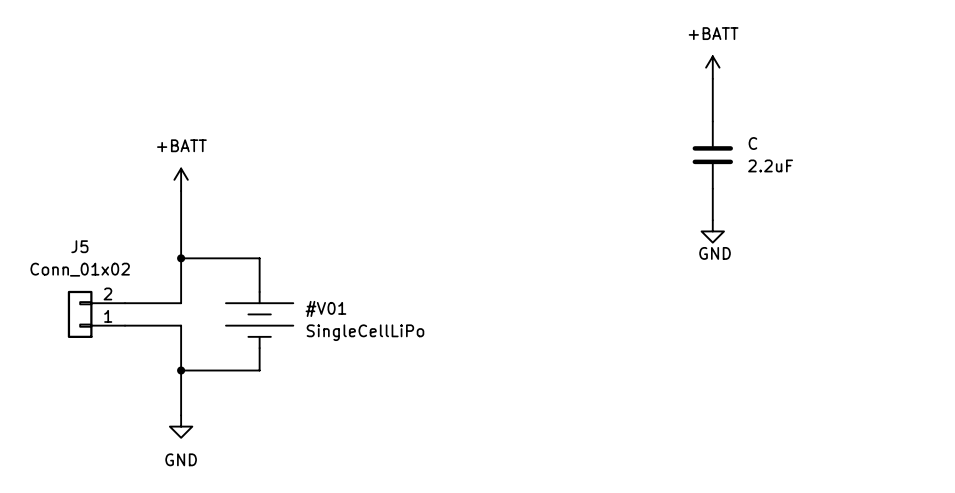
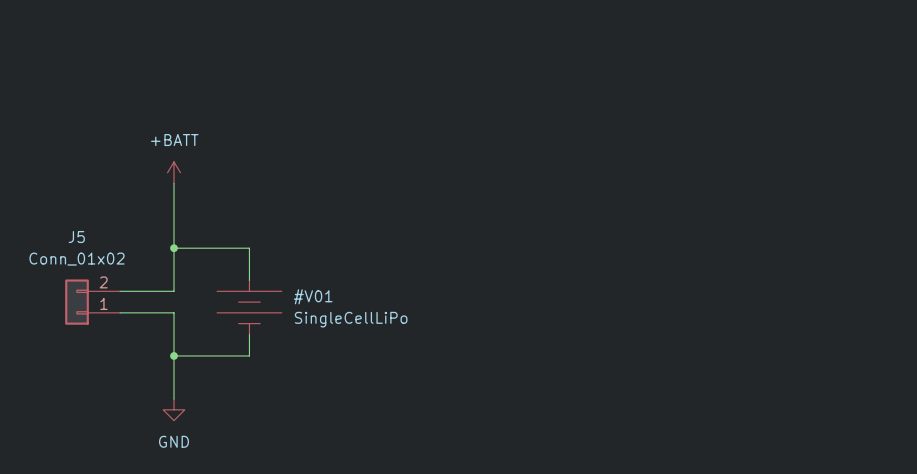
power symbol: +BATT (712, 67) -> none
wire: (712, 78) (712, 121) -> none
C: 2.2uF (712, 155) -> none
wire: (712, 188) (712, 220) -> none
power symbol: GND (712, 231) -> none

